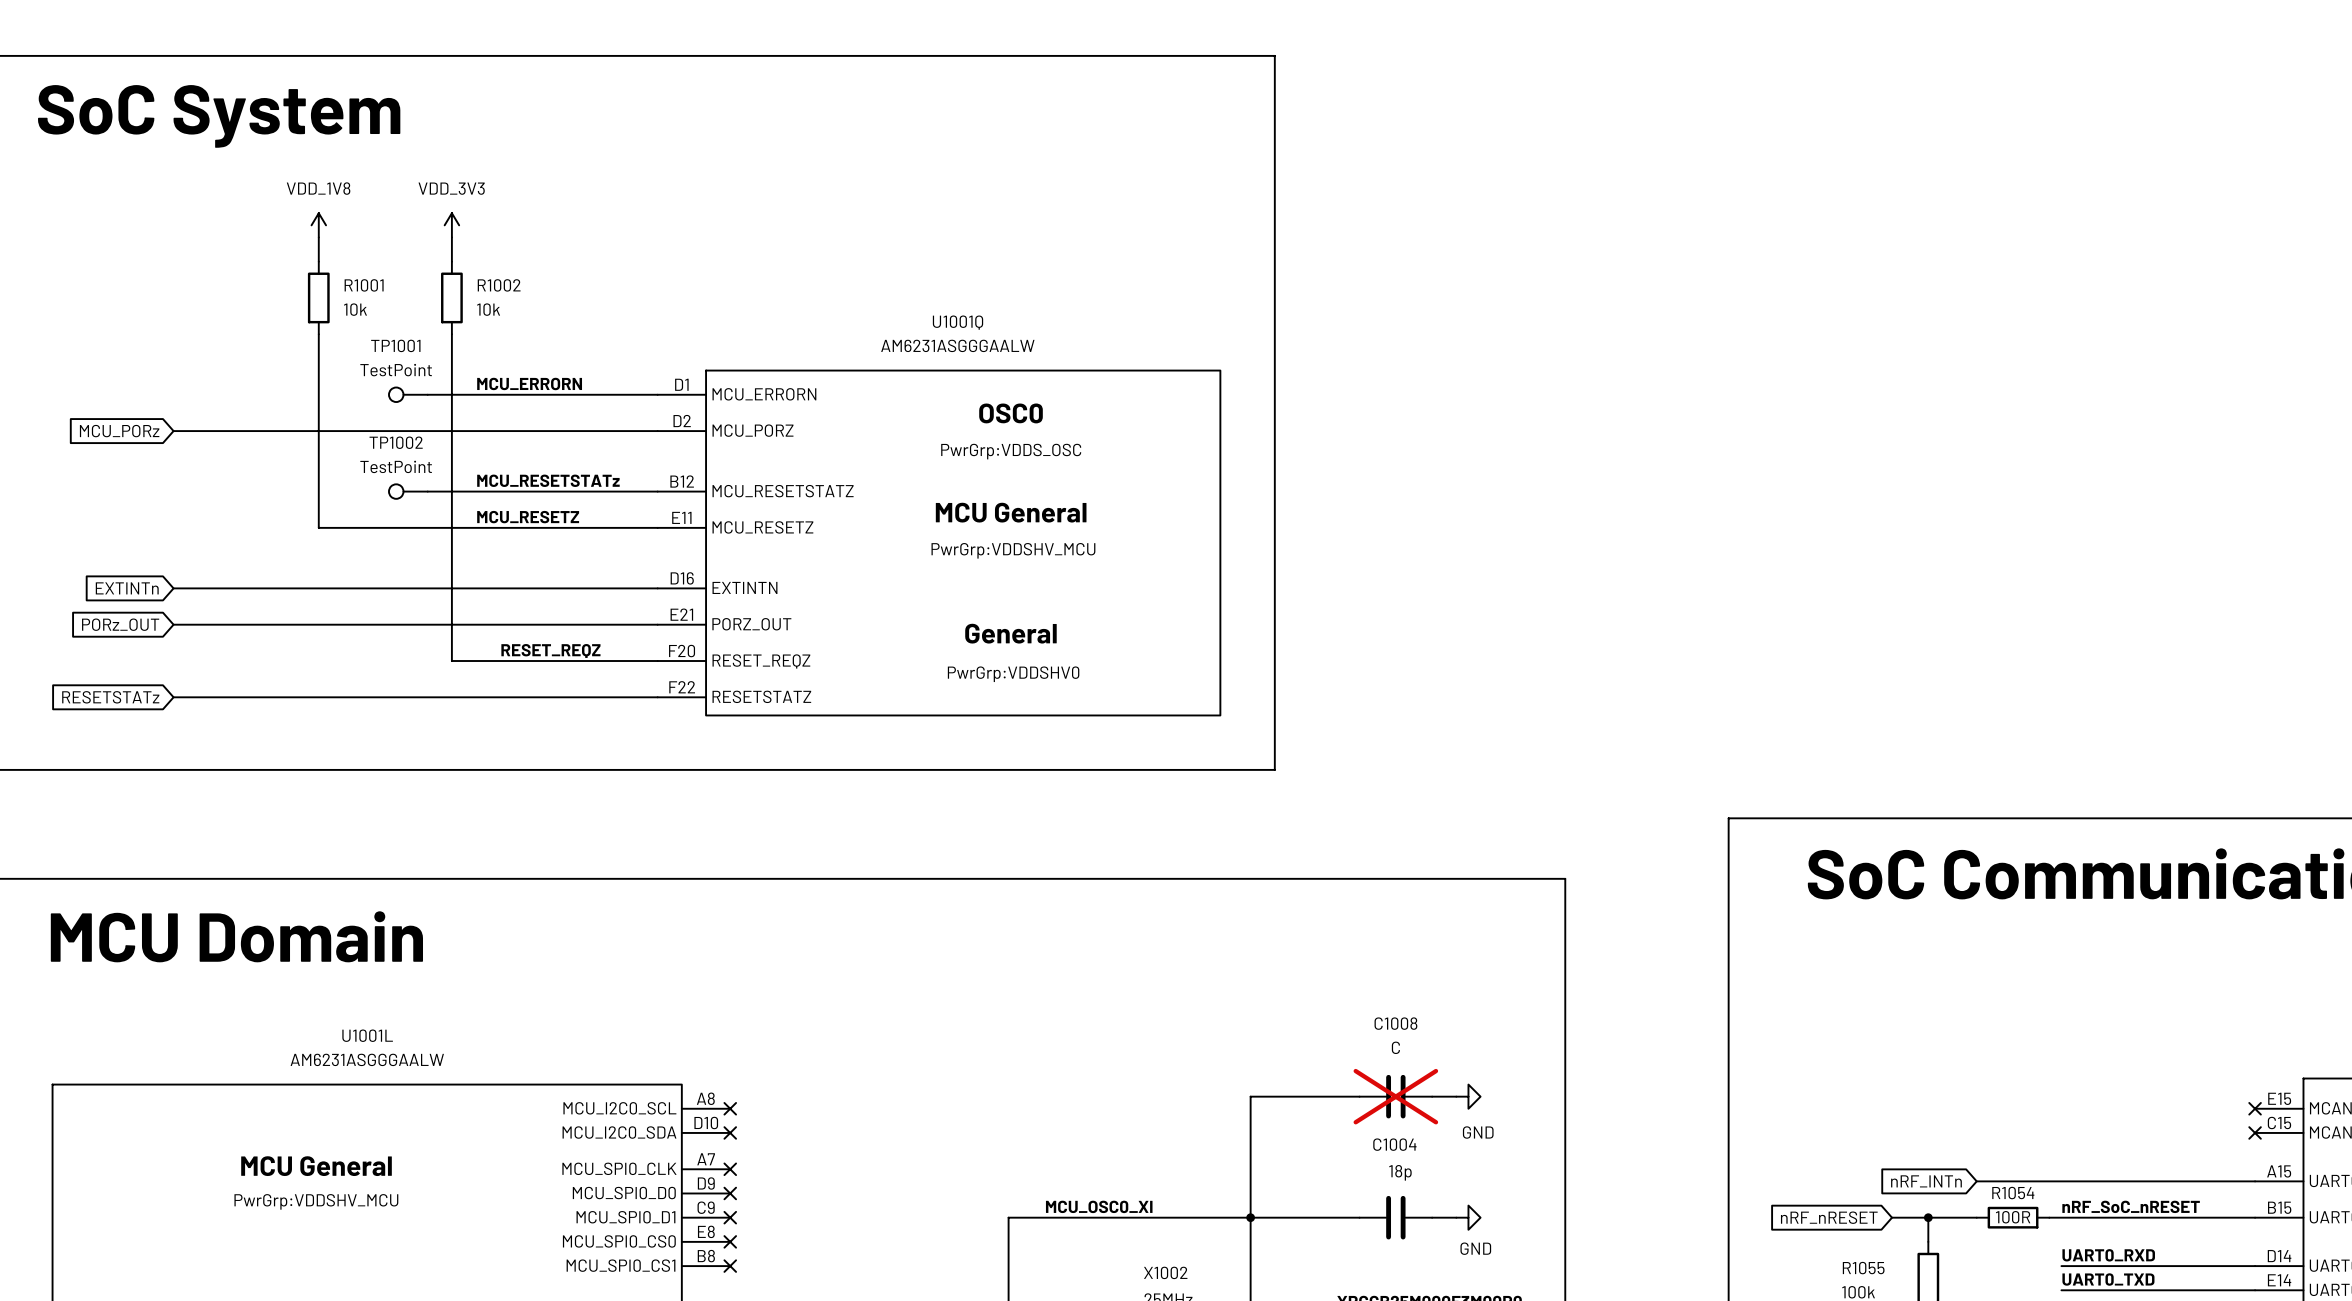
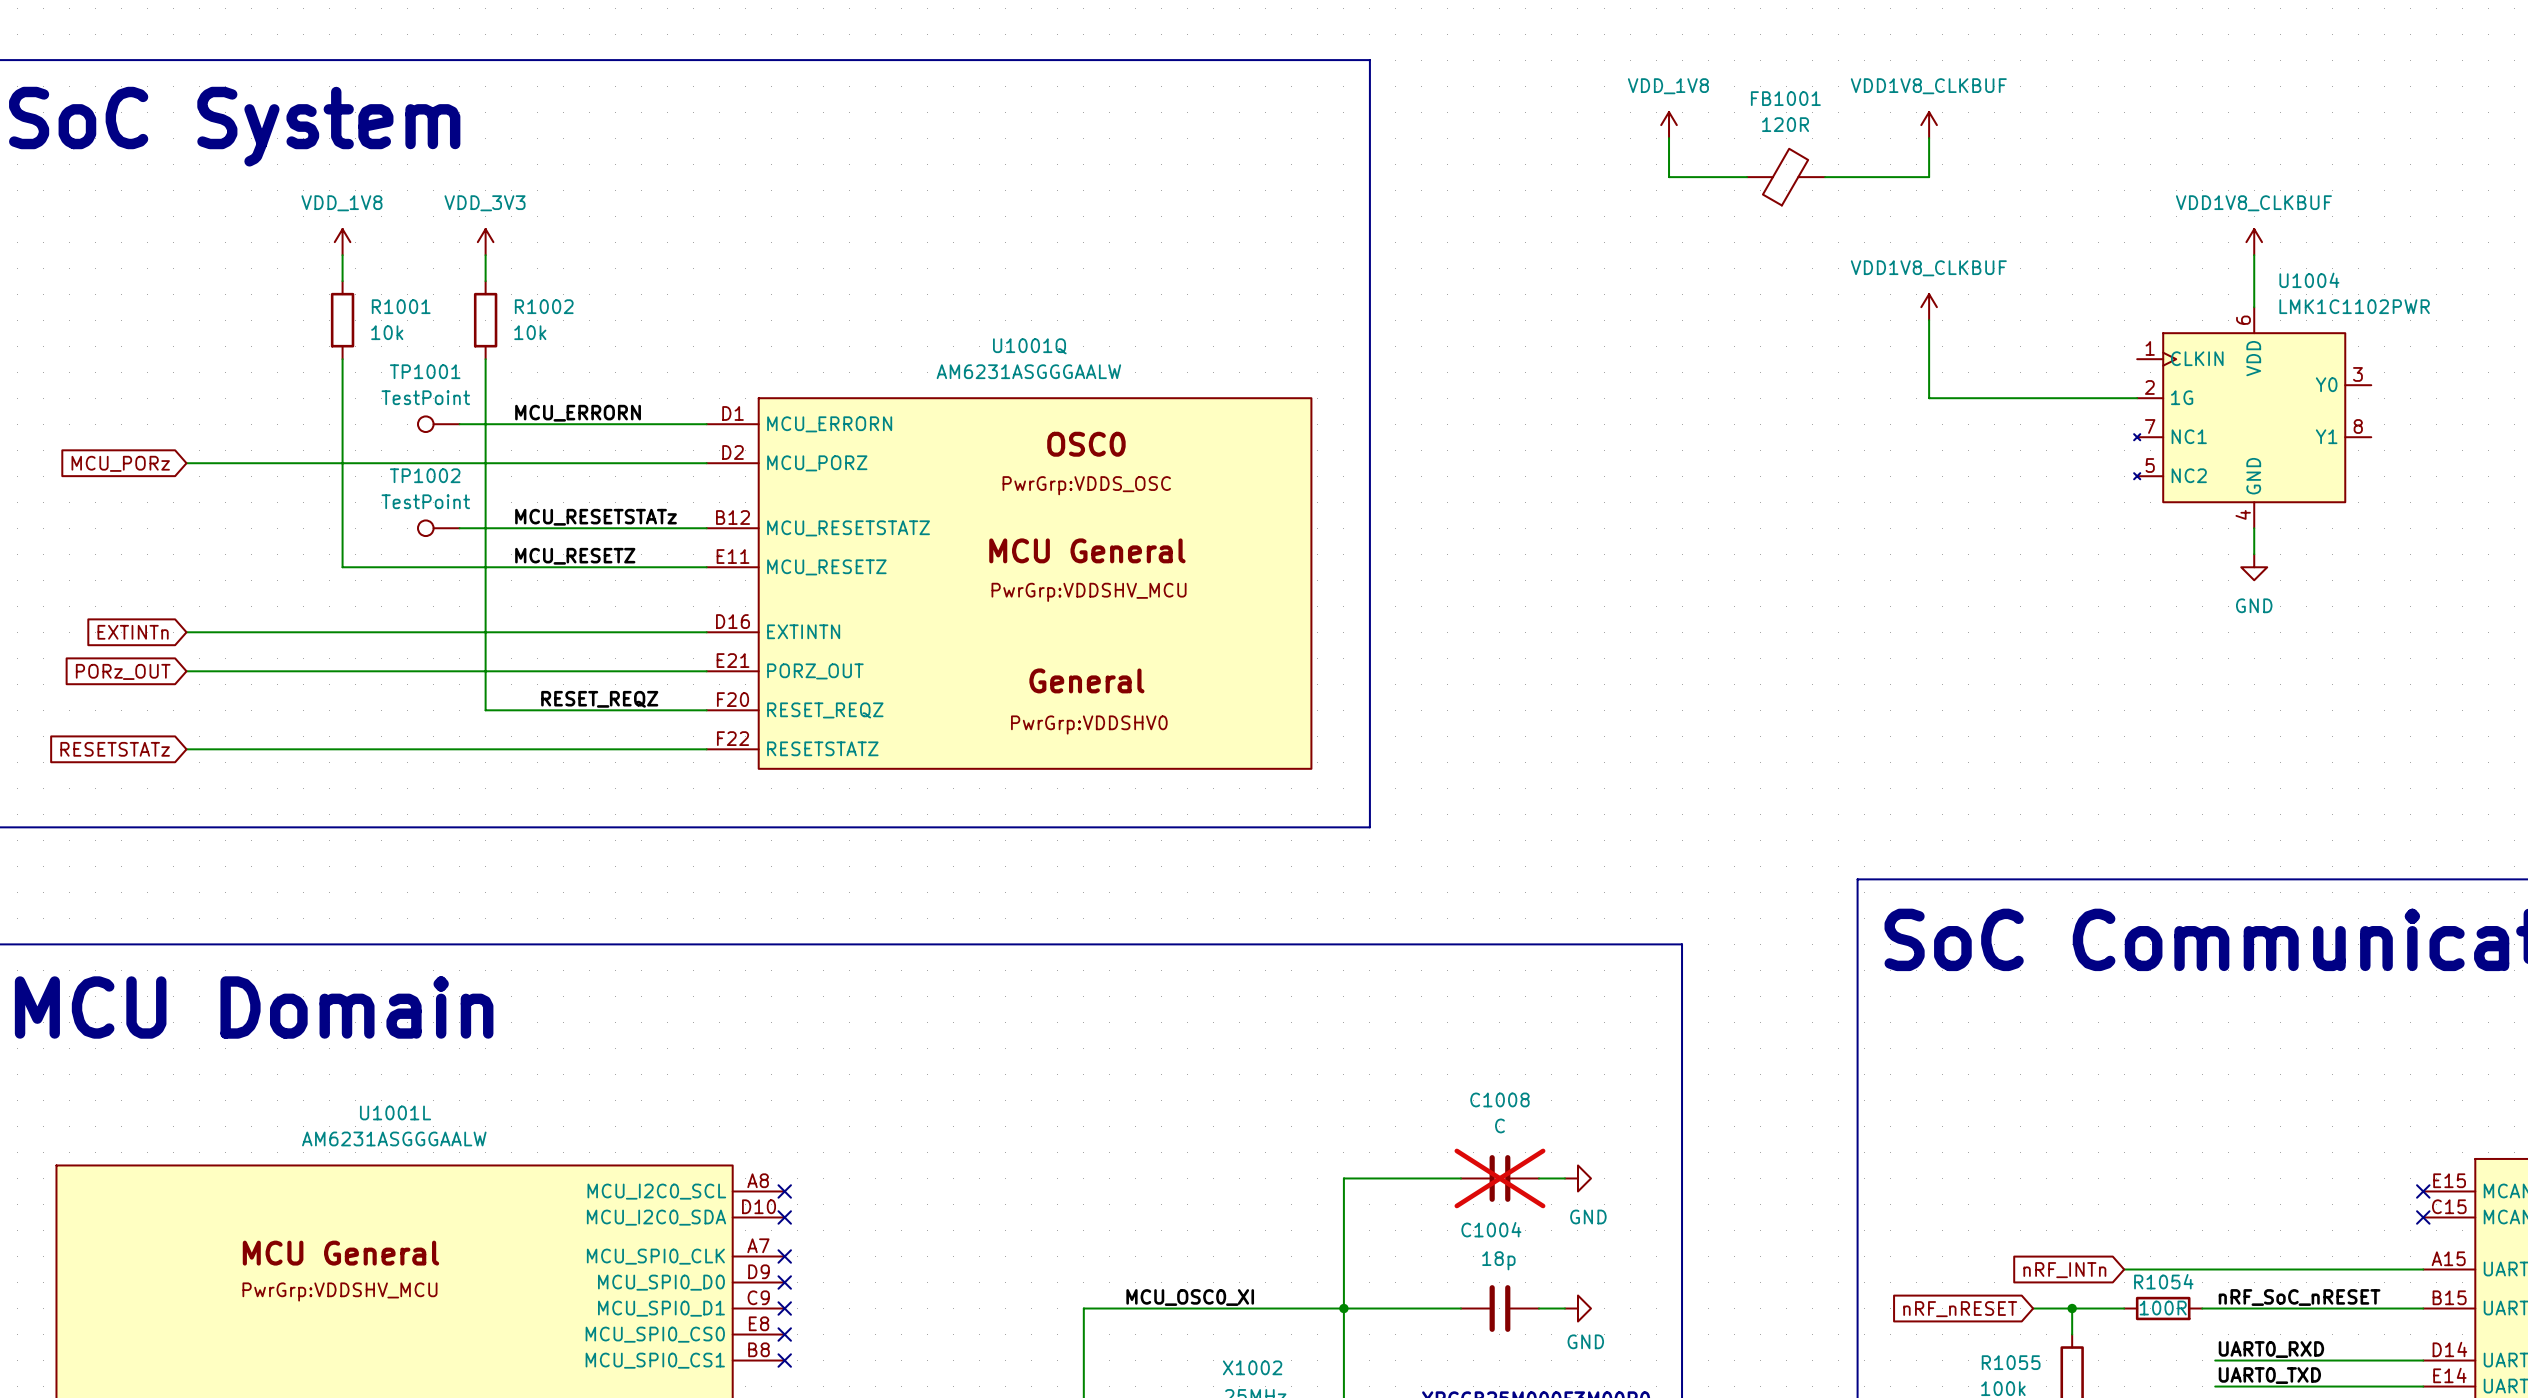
power symbol: none -> VDD_1V8 (1669, 125)
power symbol: none -> VDD1V8_CLKBUF (1929, 125)
wire: none -> (1669, 138) (1669, 177) (1747, 177)
wire: none -> (1929, 138) (1929, 177) (1825, 177)
FB1001: none -> 120R (1786, 177)
power symbol: none -> VDD1V8_CLKBUF (2254, 242)
wire: none -> (2254, 255) (2254, 307)
power symbol: none -> VDD1V8_CLKBUF (1929, 307)
wire: none -> (1929, 320) (1929, 398) (2137, 398)
U1004: none -> LMK1C1102PWR (2252, 417)
wire: none -> (2254, 528) (2254, 554)
power symbol: none -> GND (2254, 567)

